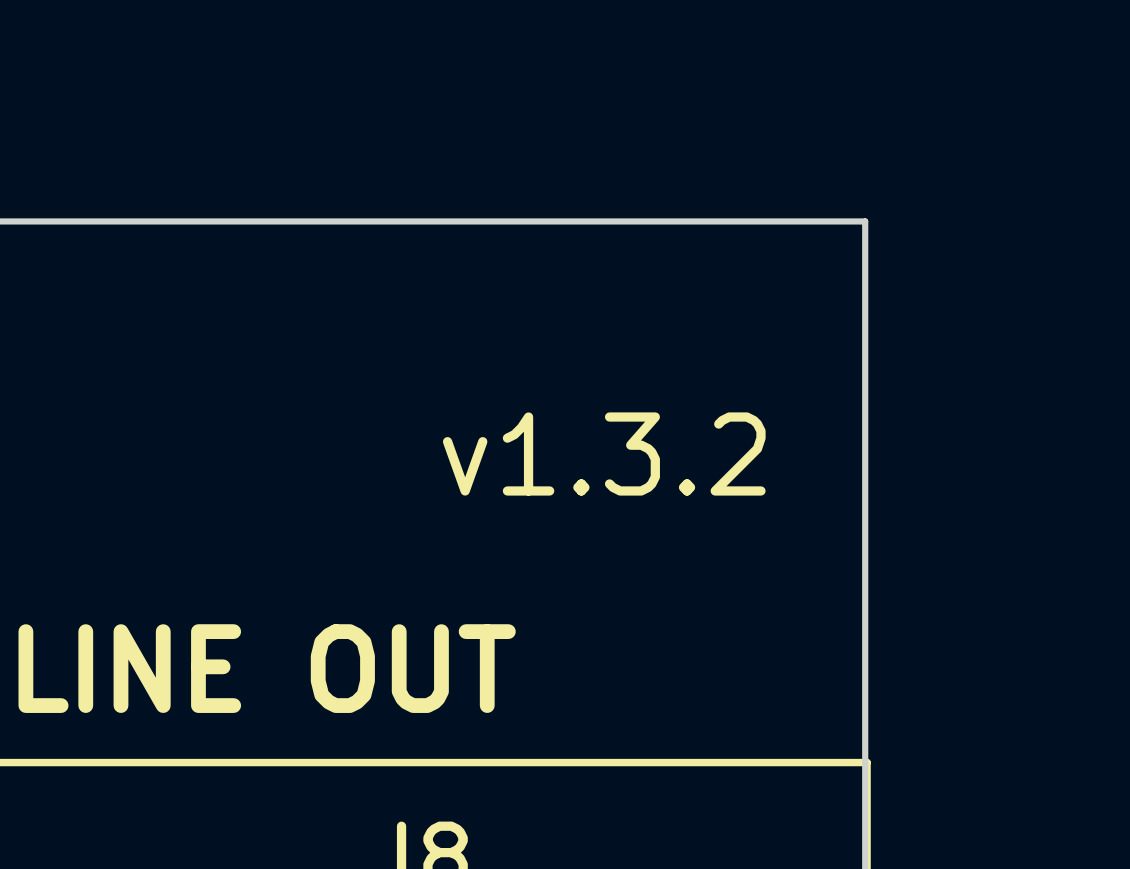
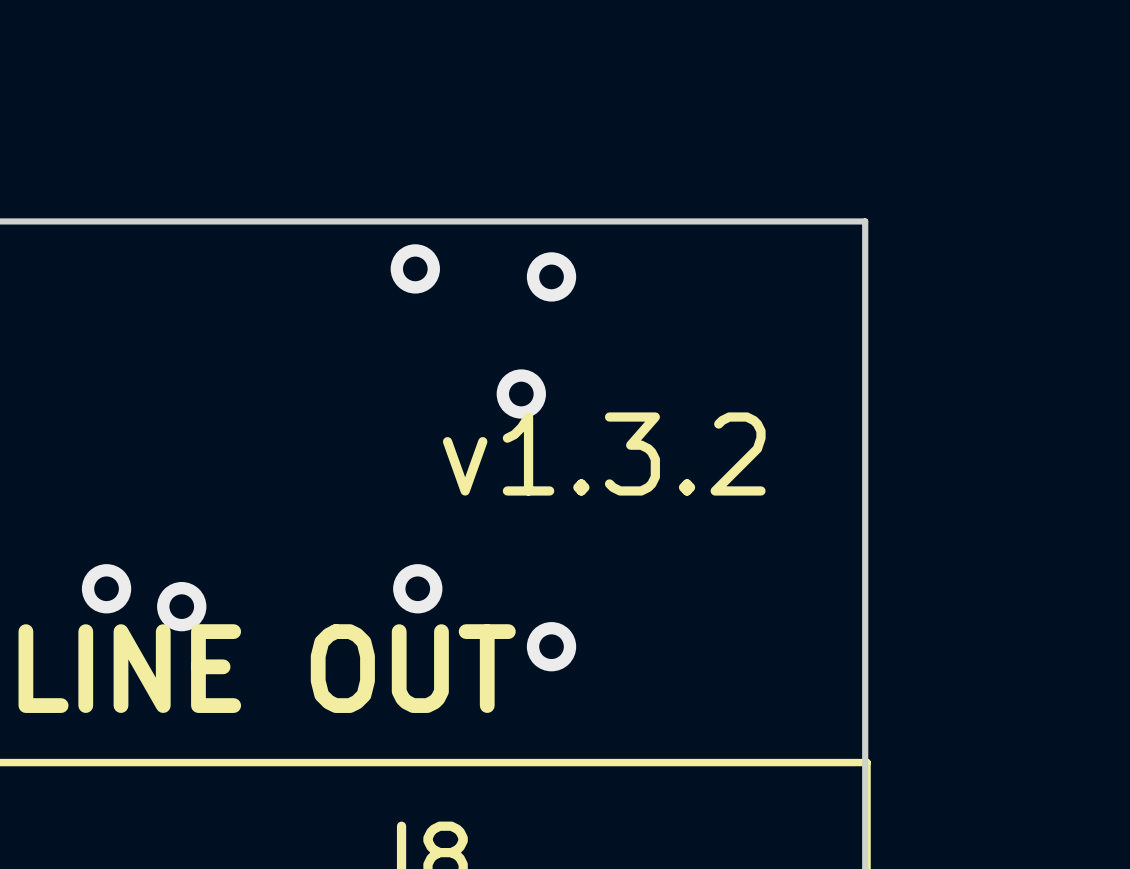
via: none -> (415, 268)
via: none -> (551, 276)
via: none -> (521, 394)
via: none -> (106, 588)
via: none -> (417, 588)
via: none -> (181, 606)
via: none -> (551, 646)

